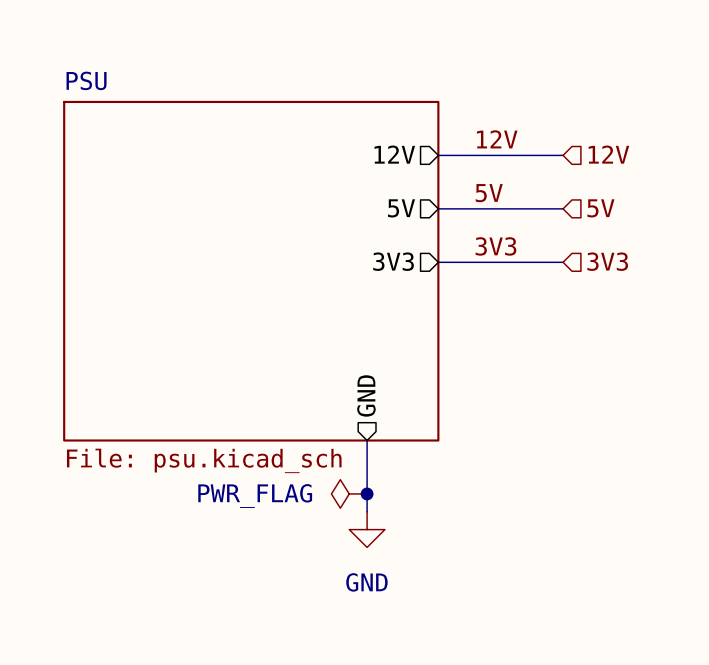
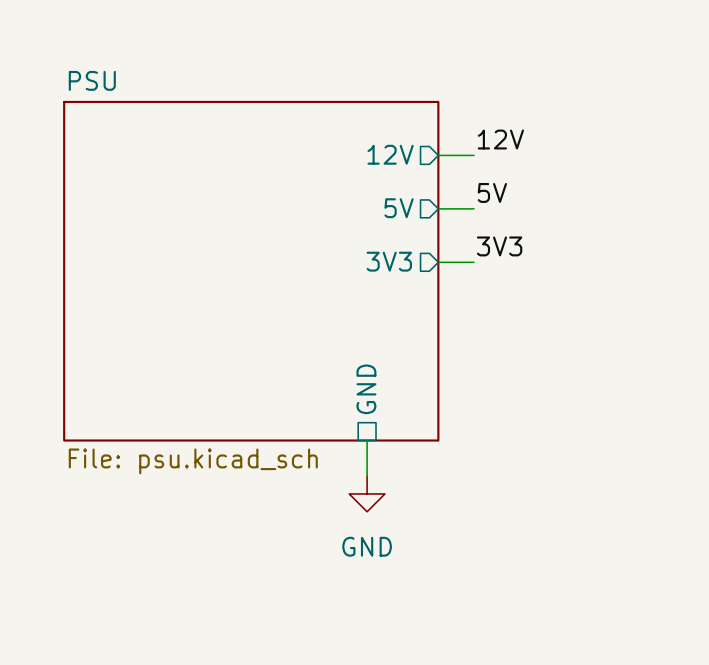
hierarchical label: 12V (608, 154) -> none
wire: (474, 155) (563, 155) -> none
wire: (474, 208) (563, 208) -> none
hierarchical label: 5V (600, 208) -> none
hierarchical label: 3V3 (607, 261) -> none
wire: (474, 262) (563, 262) -> none
sheet pin shape: output (366, 395) -> passive (366, 389)
power symbol: PWR_FLAG (349, 493) -> none
junction: (367, 493) -> none
power symbol position: GND (367, 529) -> GND (367, 493)

